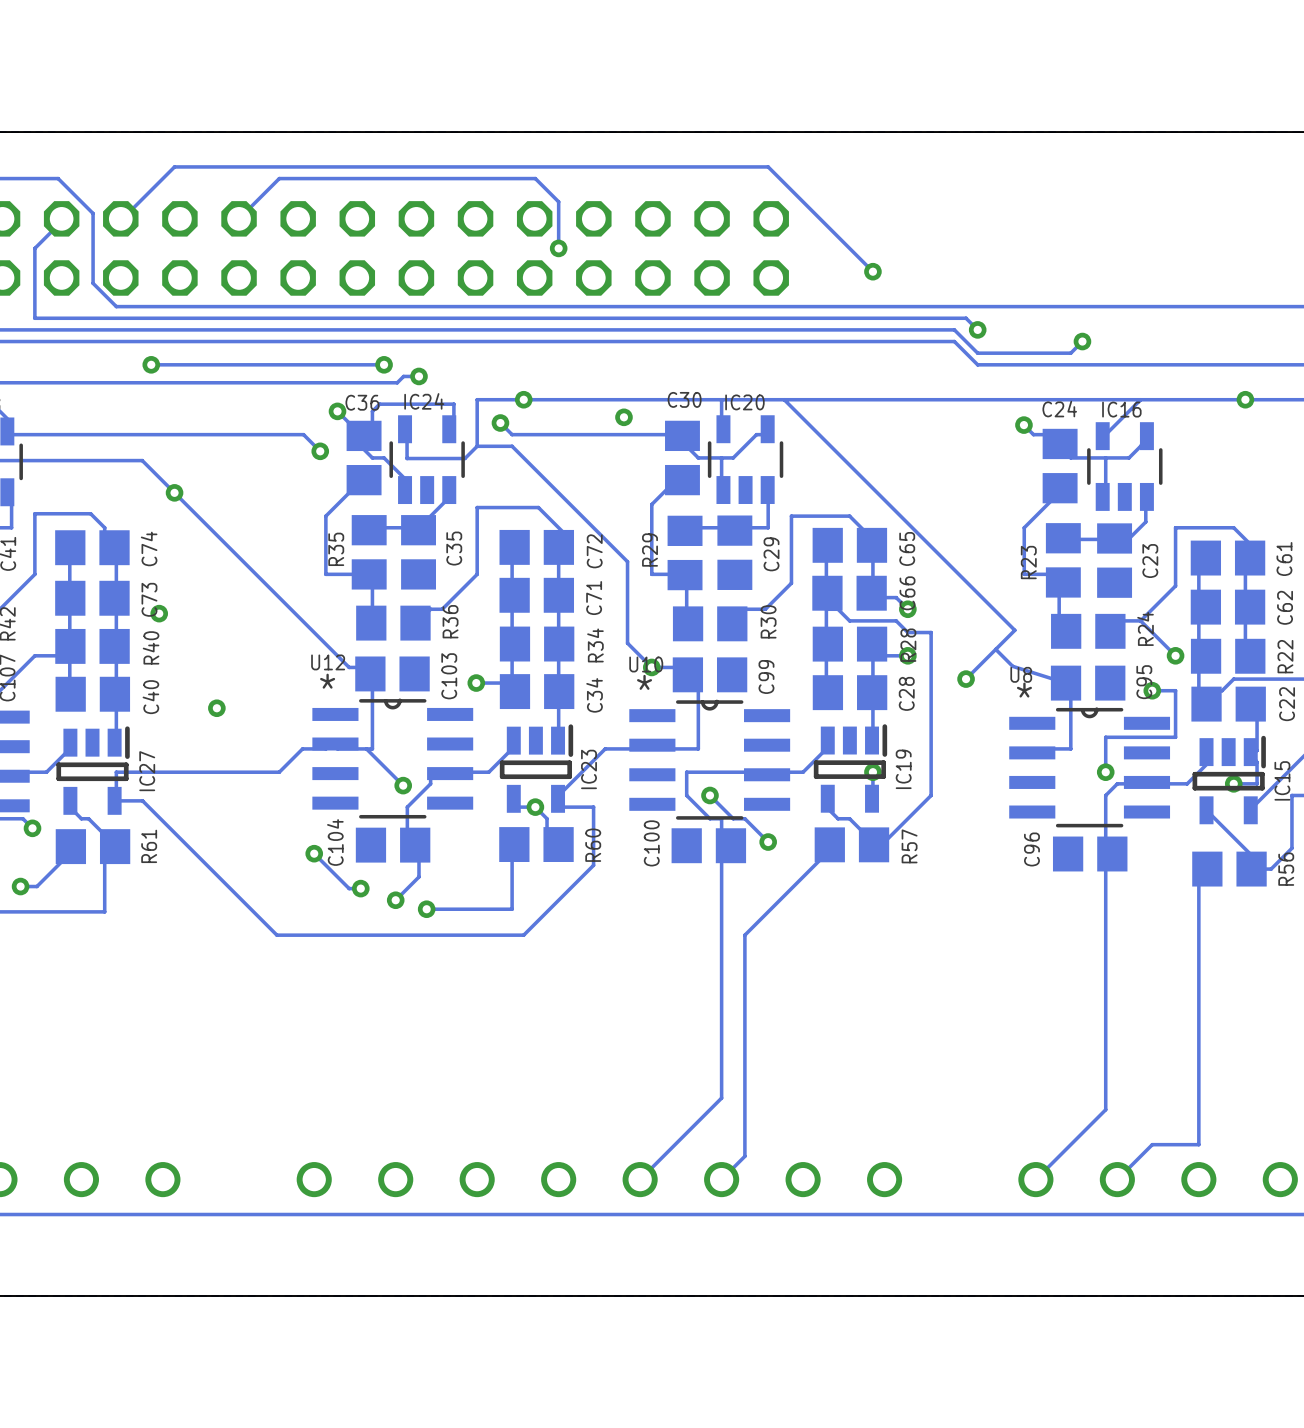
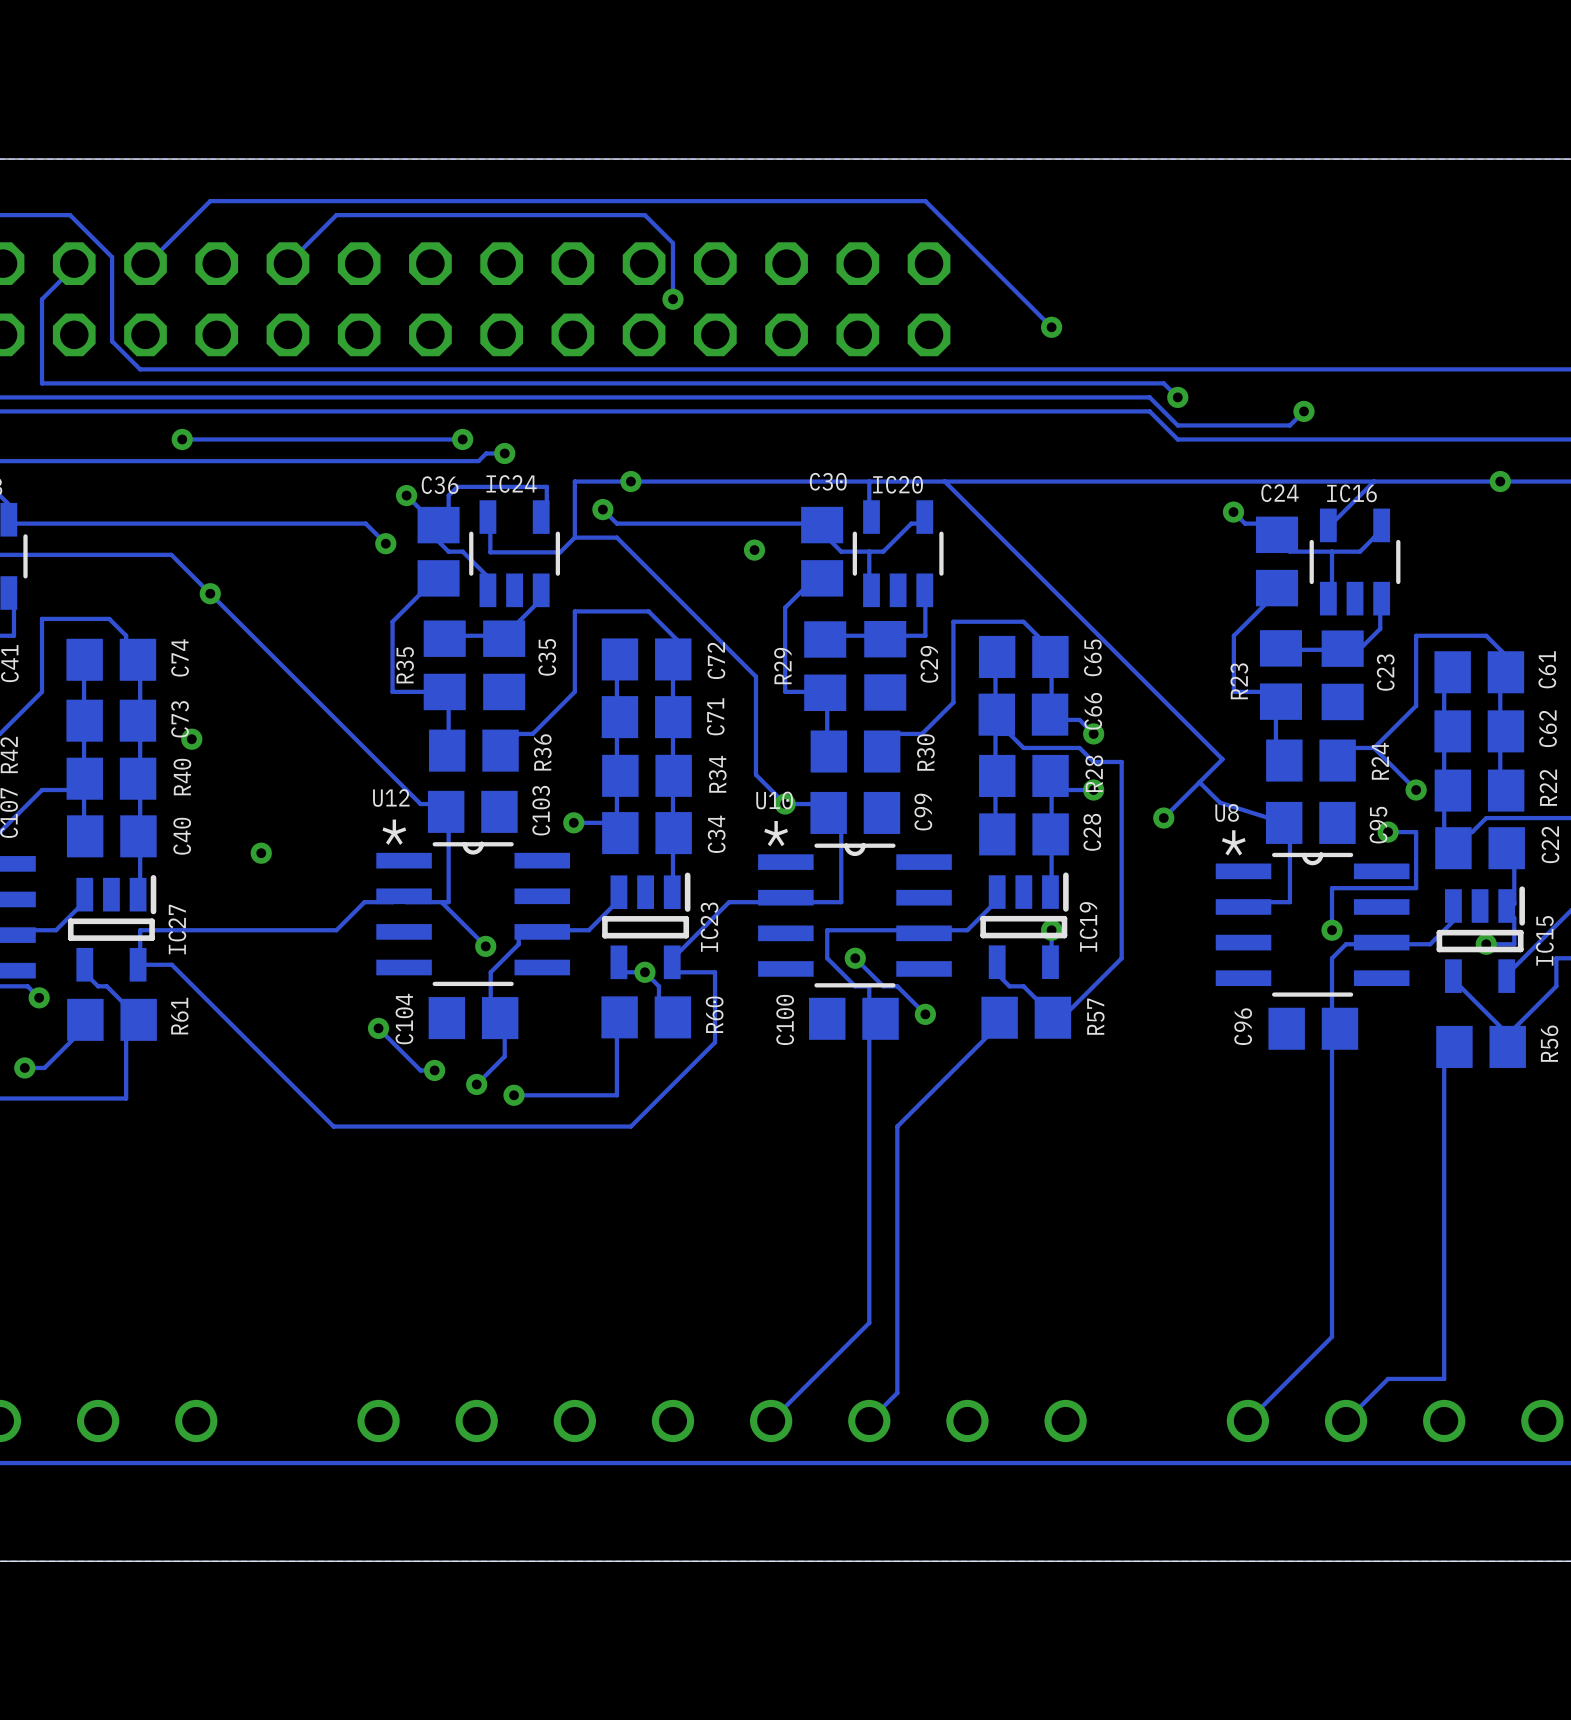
via position: (623, 417) -> (754, 550)
track: none -> (1453, 973) (1457, 983) (1508, 1034) (1495, 1047) (1507, 1046)
track: (1206, 810) (1251, 855) (1251, 869) (1271, 869) (1291, 848) (1291, 818) -> (1514, 1028) (1556, 986)

